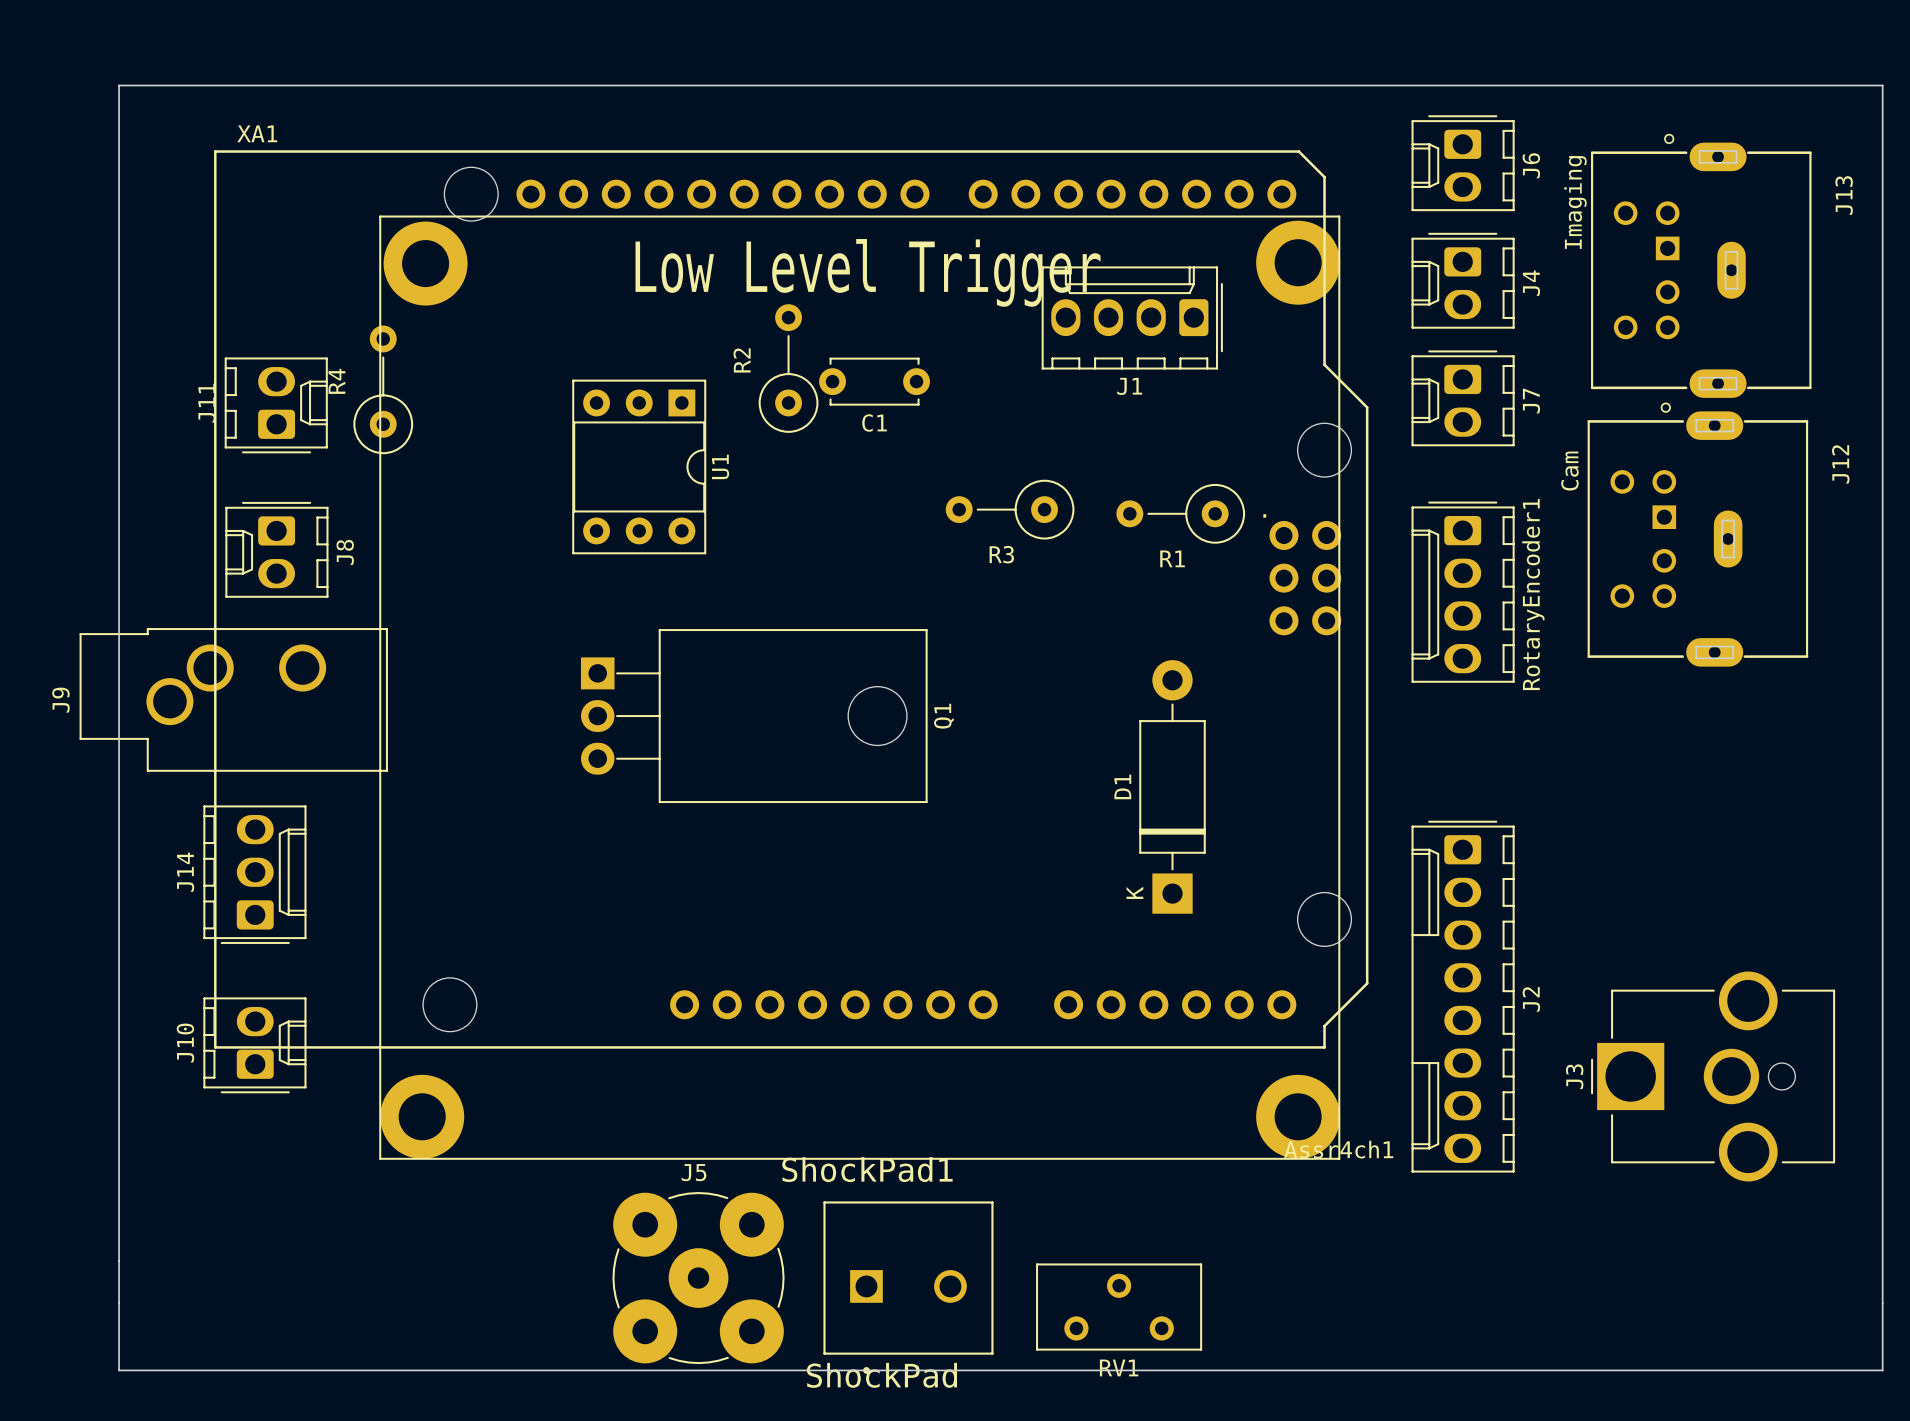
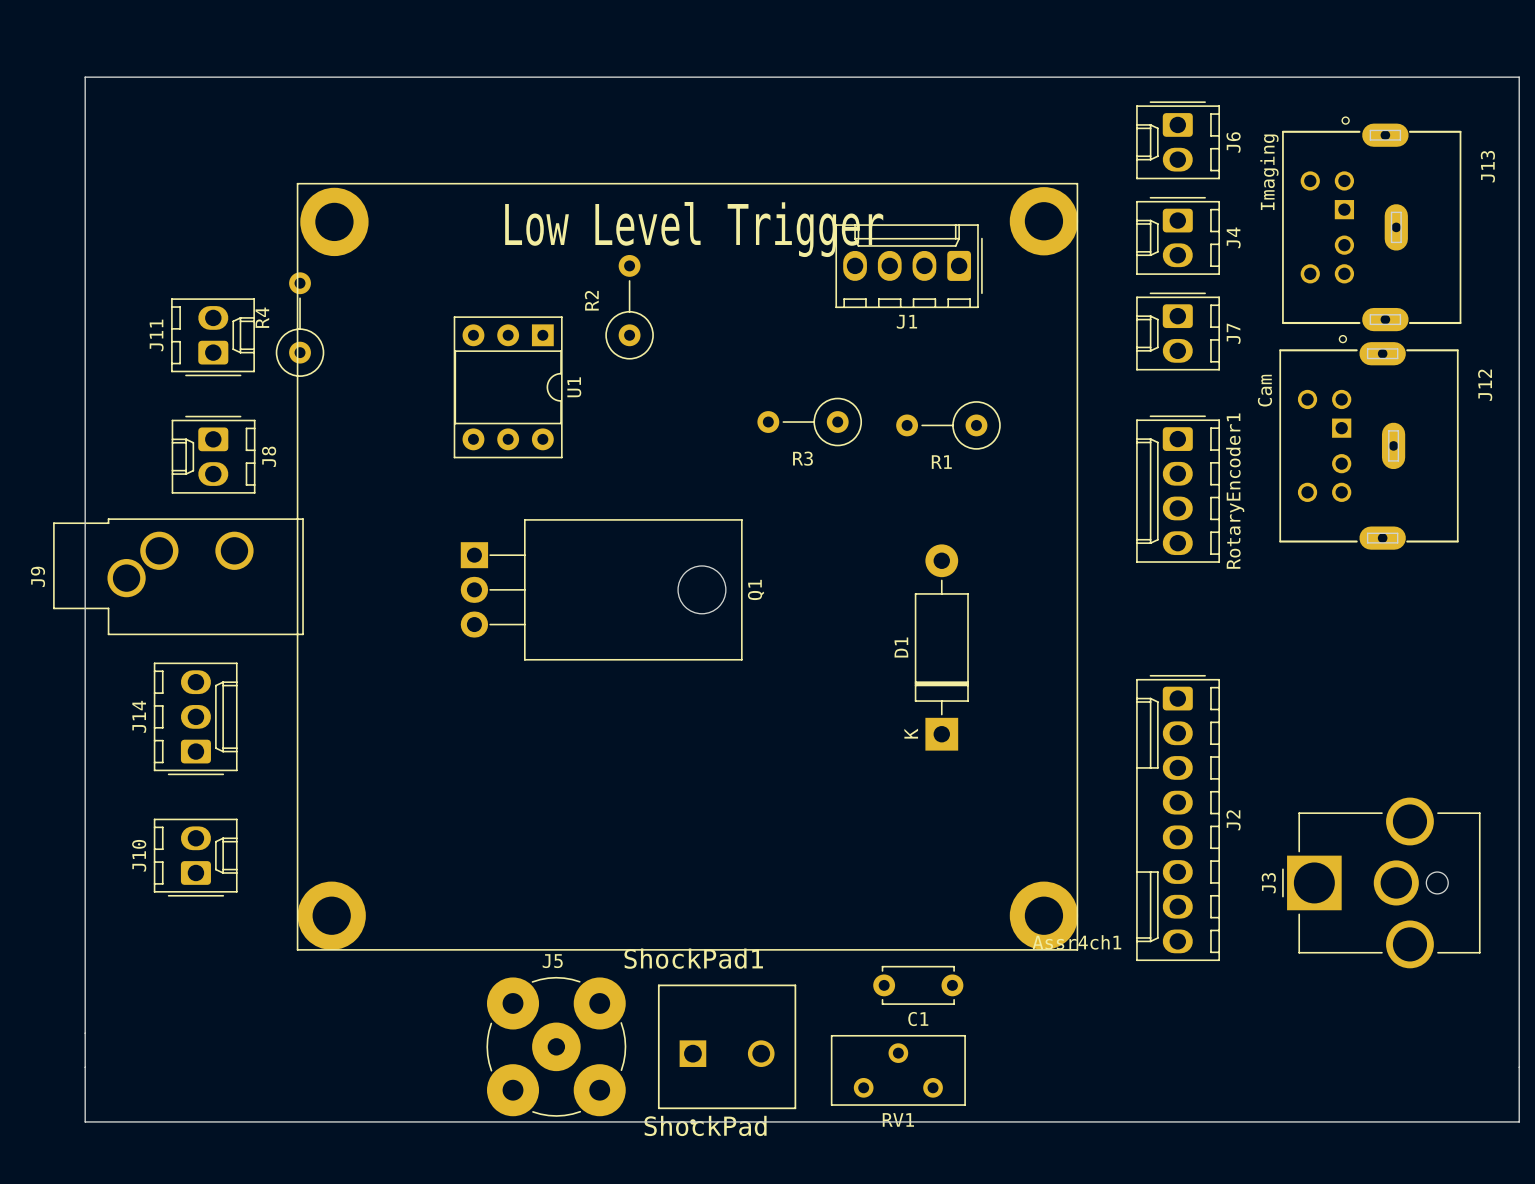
C1 position: (874, 381) -> (918, 985)
XA1: (791, 599) -> none

